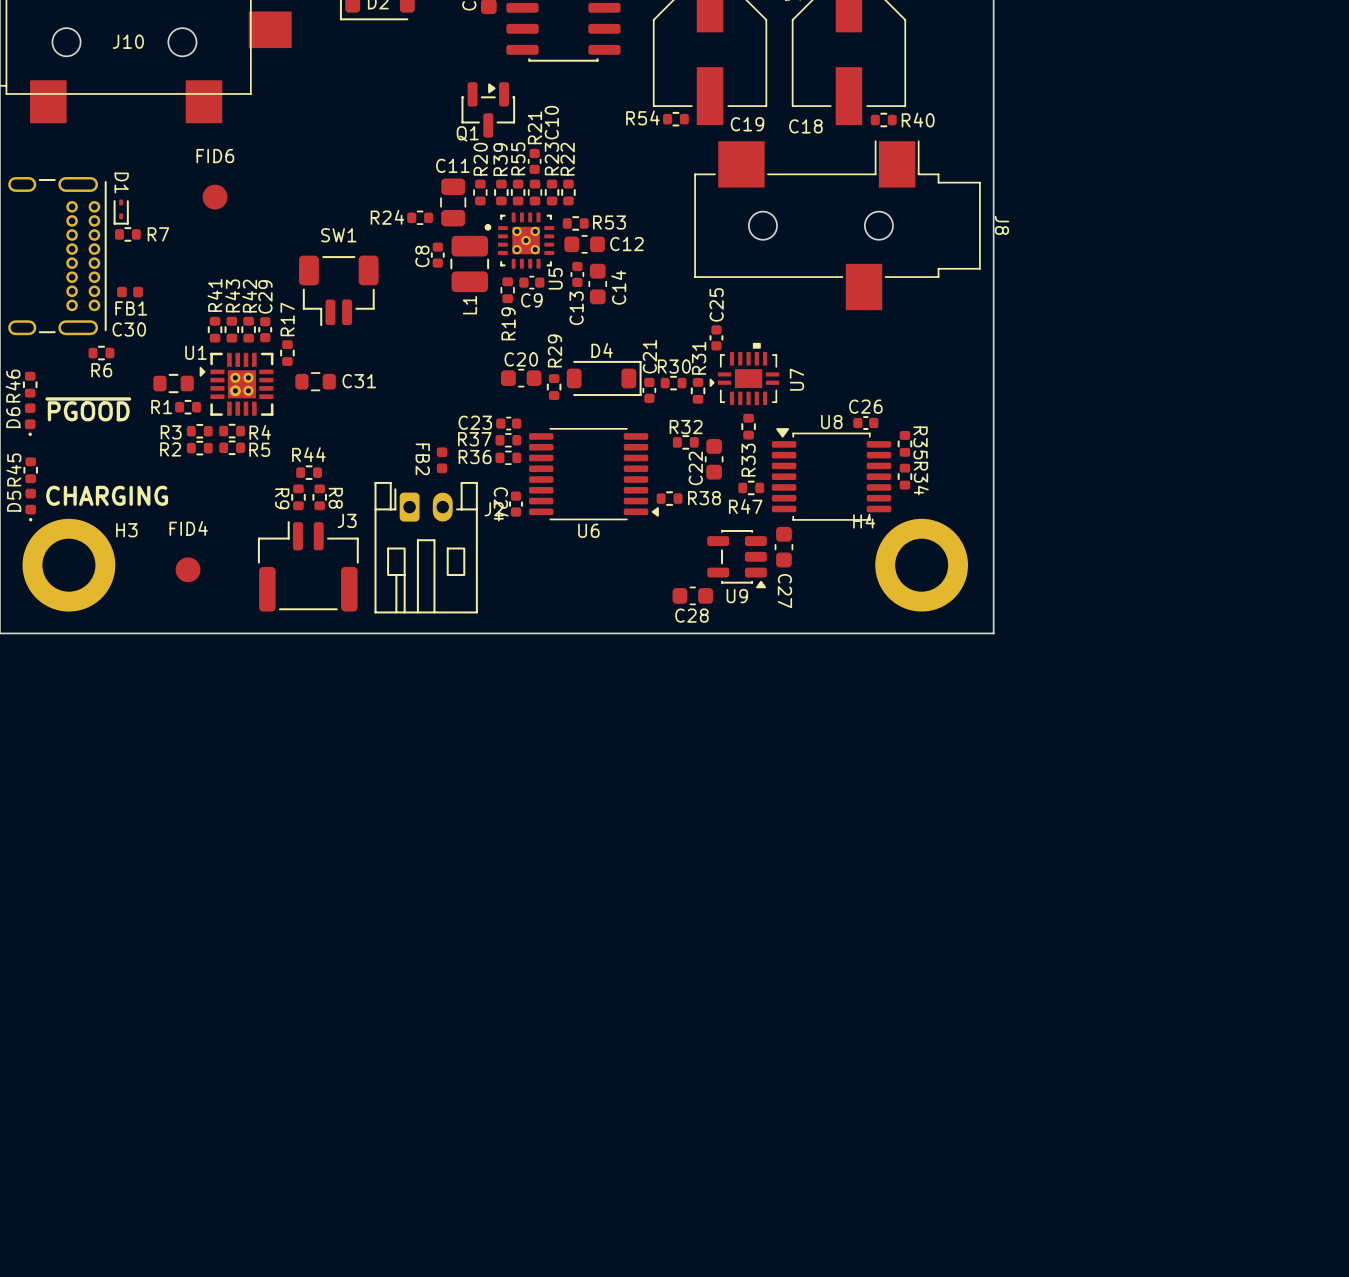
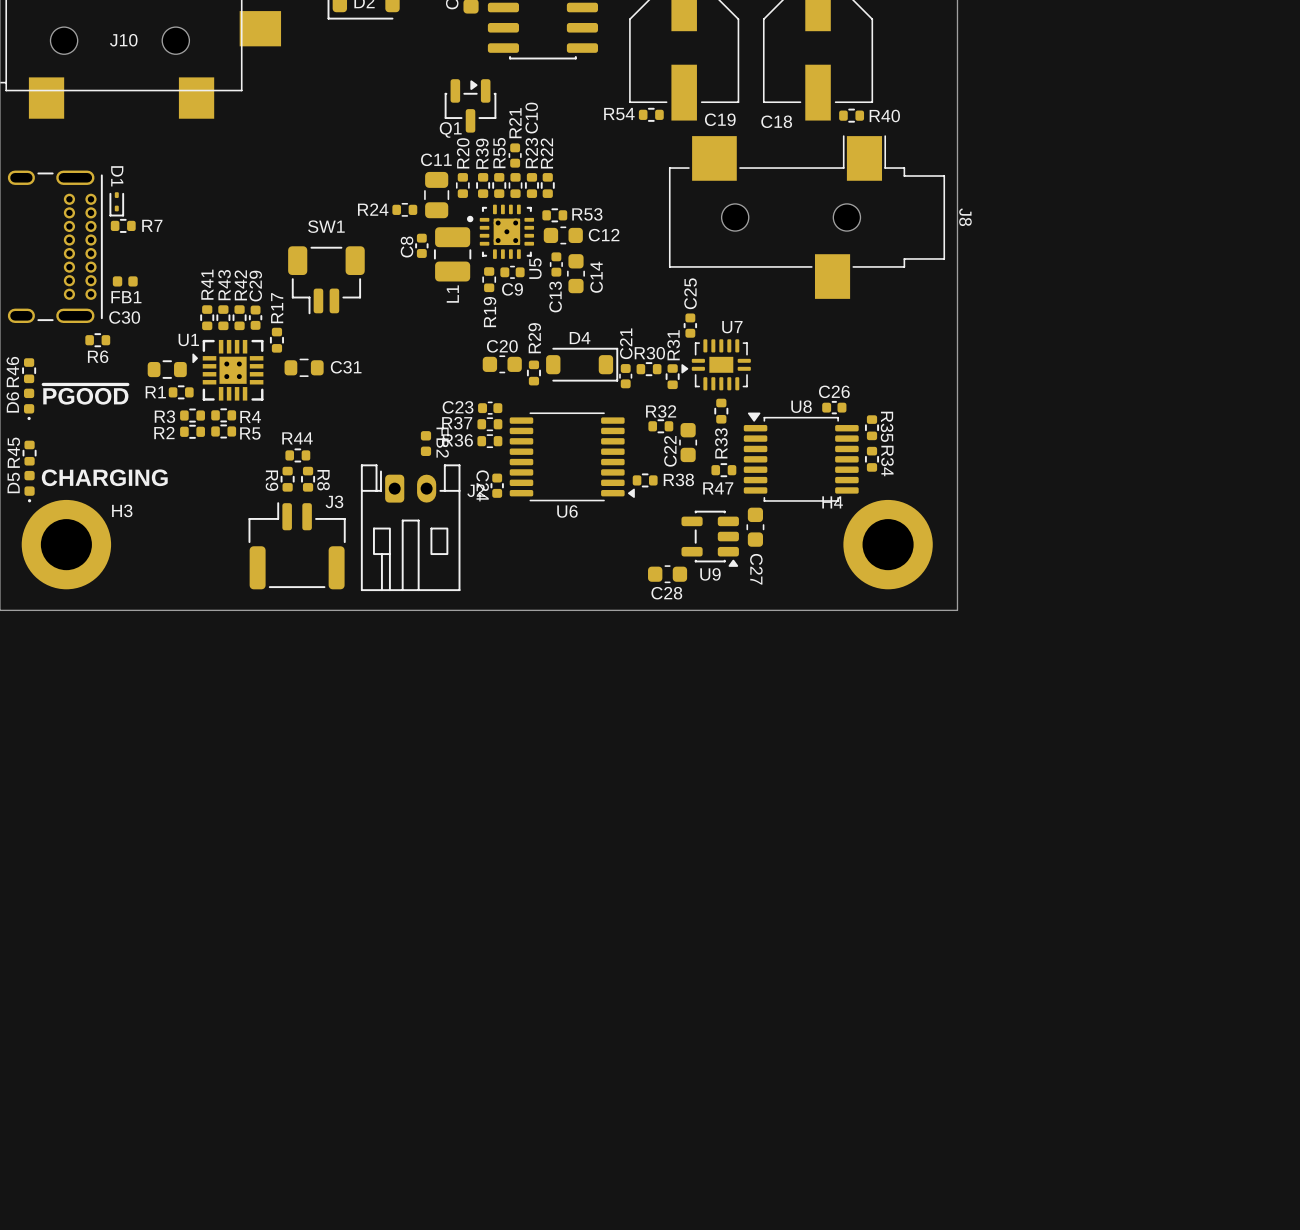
FID6: (215, 197) -> none
U7 footprint: [709, 342, 780, 406] -> [681, 339, 751, 391]
U7 name position: U7 (796, 379) -> U7 (732, 327)
FB2 name position: FB2 (422, 459) -> FB2 (442, 442)
FID4: (188, 569) -> none

